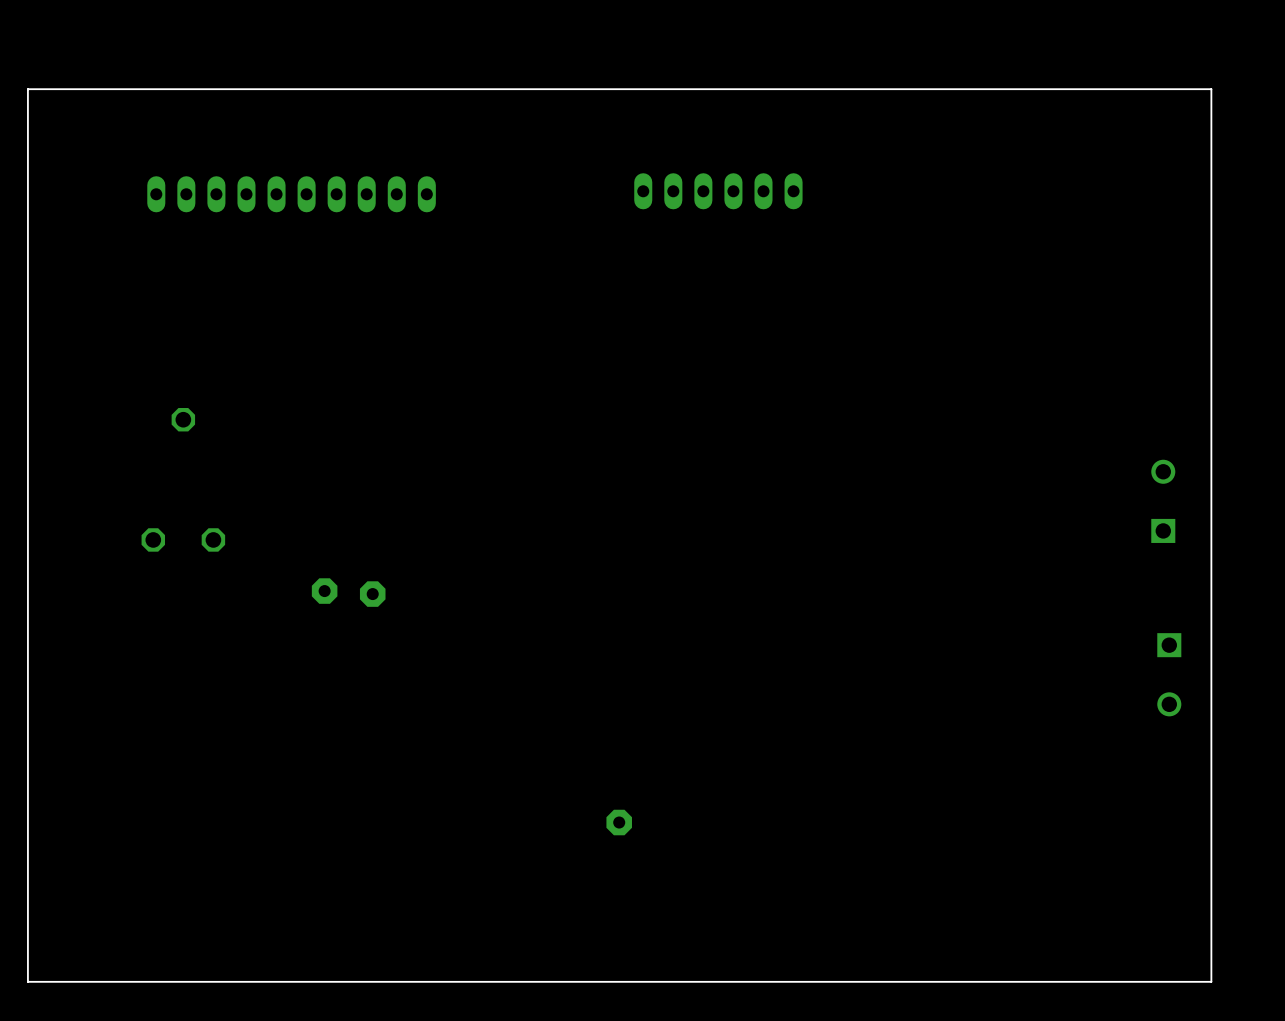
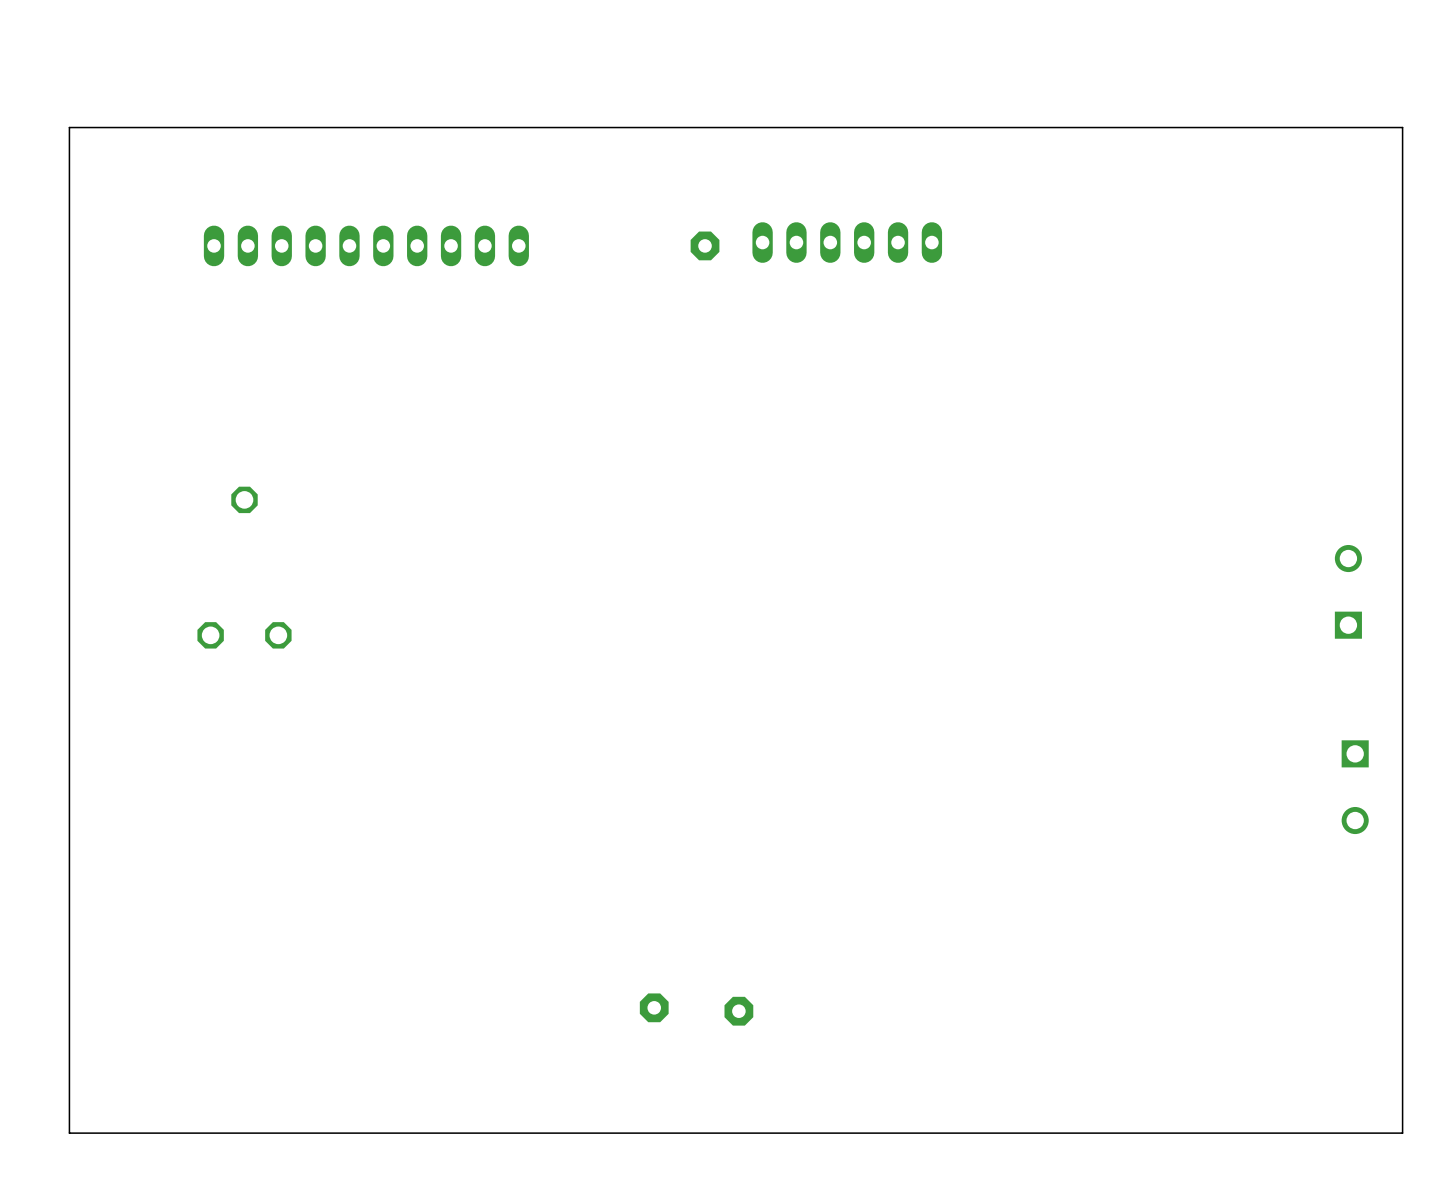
part: none -> (705, 245)
part: (324, 591) -> none
part: (372, 594) -> none
part: (619, 822) -> none
part: none -> (654, 1007)
part: none -> (738, 1011)

